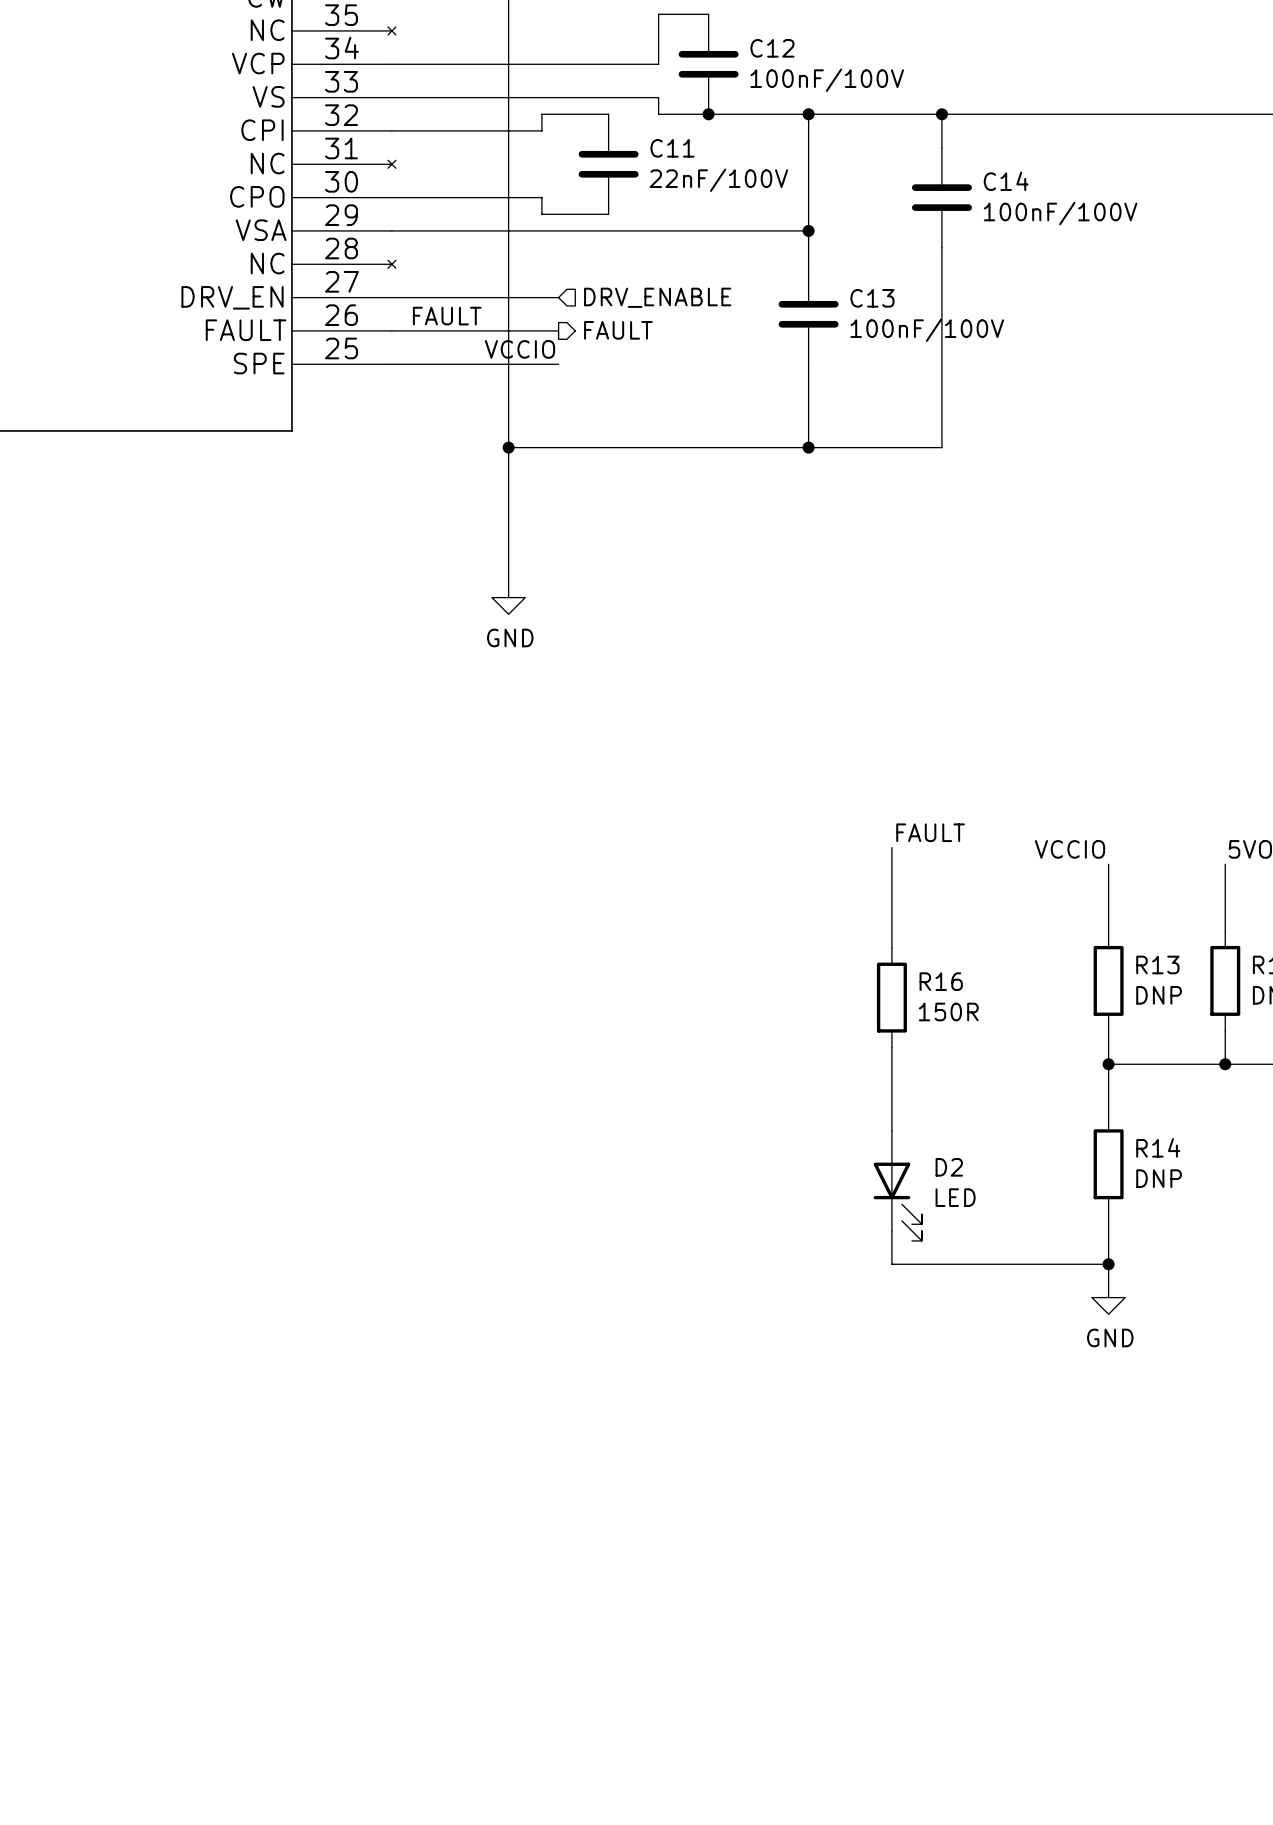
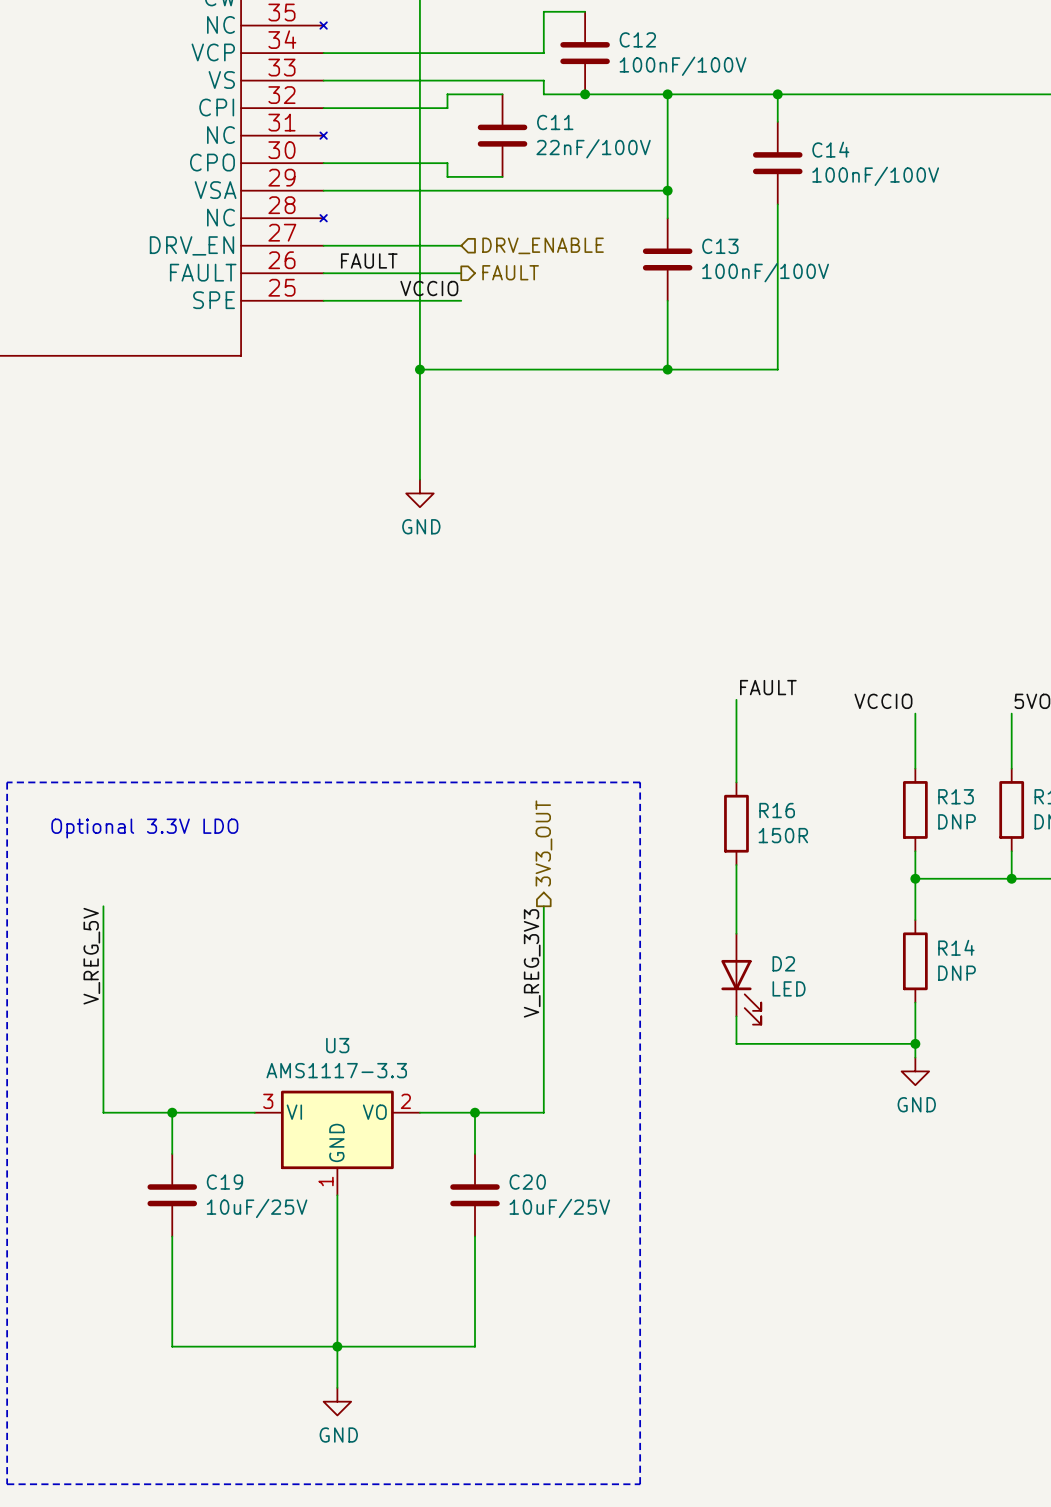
line: none -> (7, 782) (640, 782) (640, 1484) (7, 1484) (7, 782)
text: none -> Optional 3.3V LDO (144, 828)
hierarchical label: none -> 3V3_OUT (543, 843)
wire: none -> (103, 906) (103, 1112) (254, 1112)
wire: none -> (543, 906) (543, 1112) (419, 1112)
label: none -> V_REG_5V (91, 956)
label: none -> V_REG_3V3 (532, 963)
wire: none -> (172, 1112) (172, 1153)
junction: none -> (172, 1112)
wire: none -> (475, 1112) (475, 1153)
junction: none -> (475, 1112)
U3: none -> AMS1117-3.3 (337, 1142)
C19: none -> 10uF/25V (172, 1195)
wire: none -> (337, 1195) (337, 1387)
C20: none -> 10uF/25V (475, 1195)
wire: none -> (172, 1236) (172, 1346) (475, 1346) (475, 1236)
junction: none -> (337, 1346)
power symbol: none -> GND (337, 1401)

